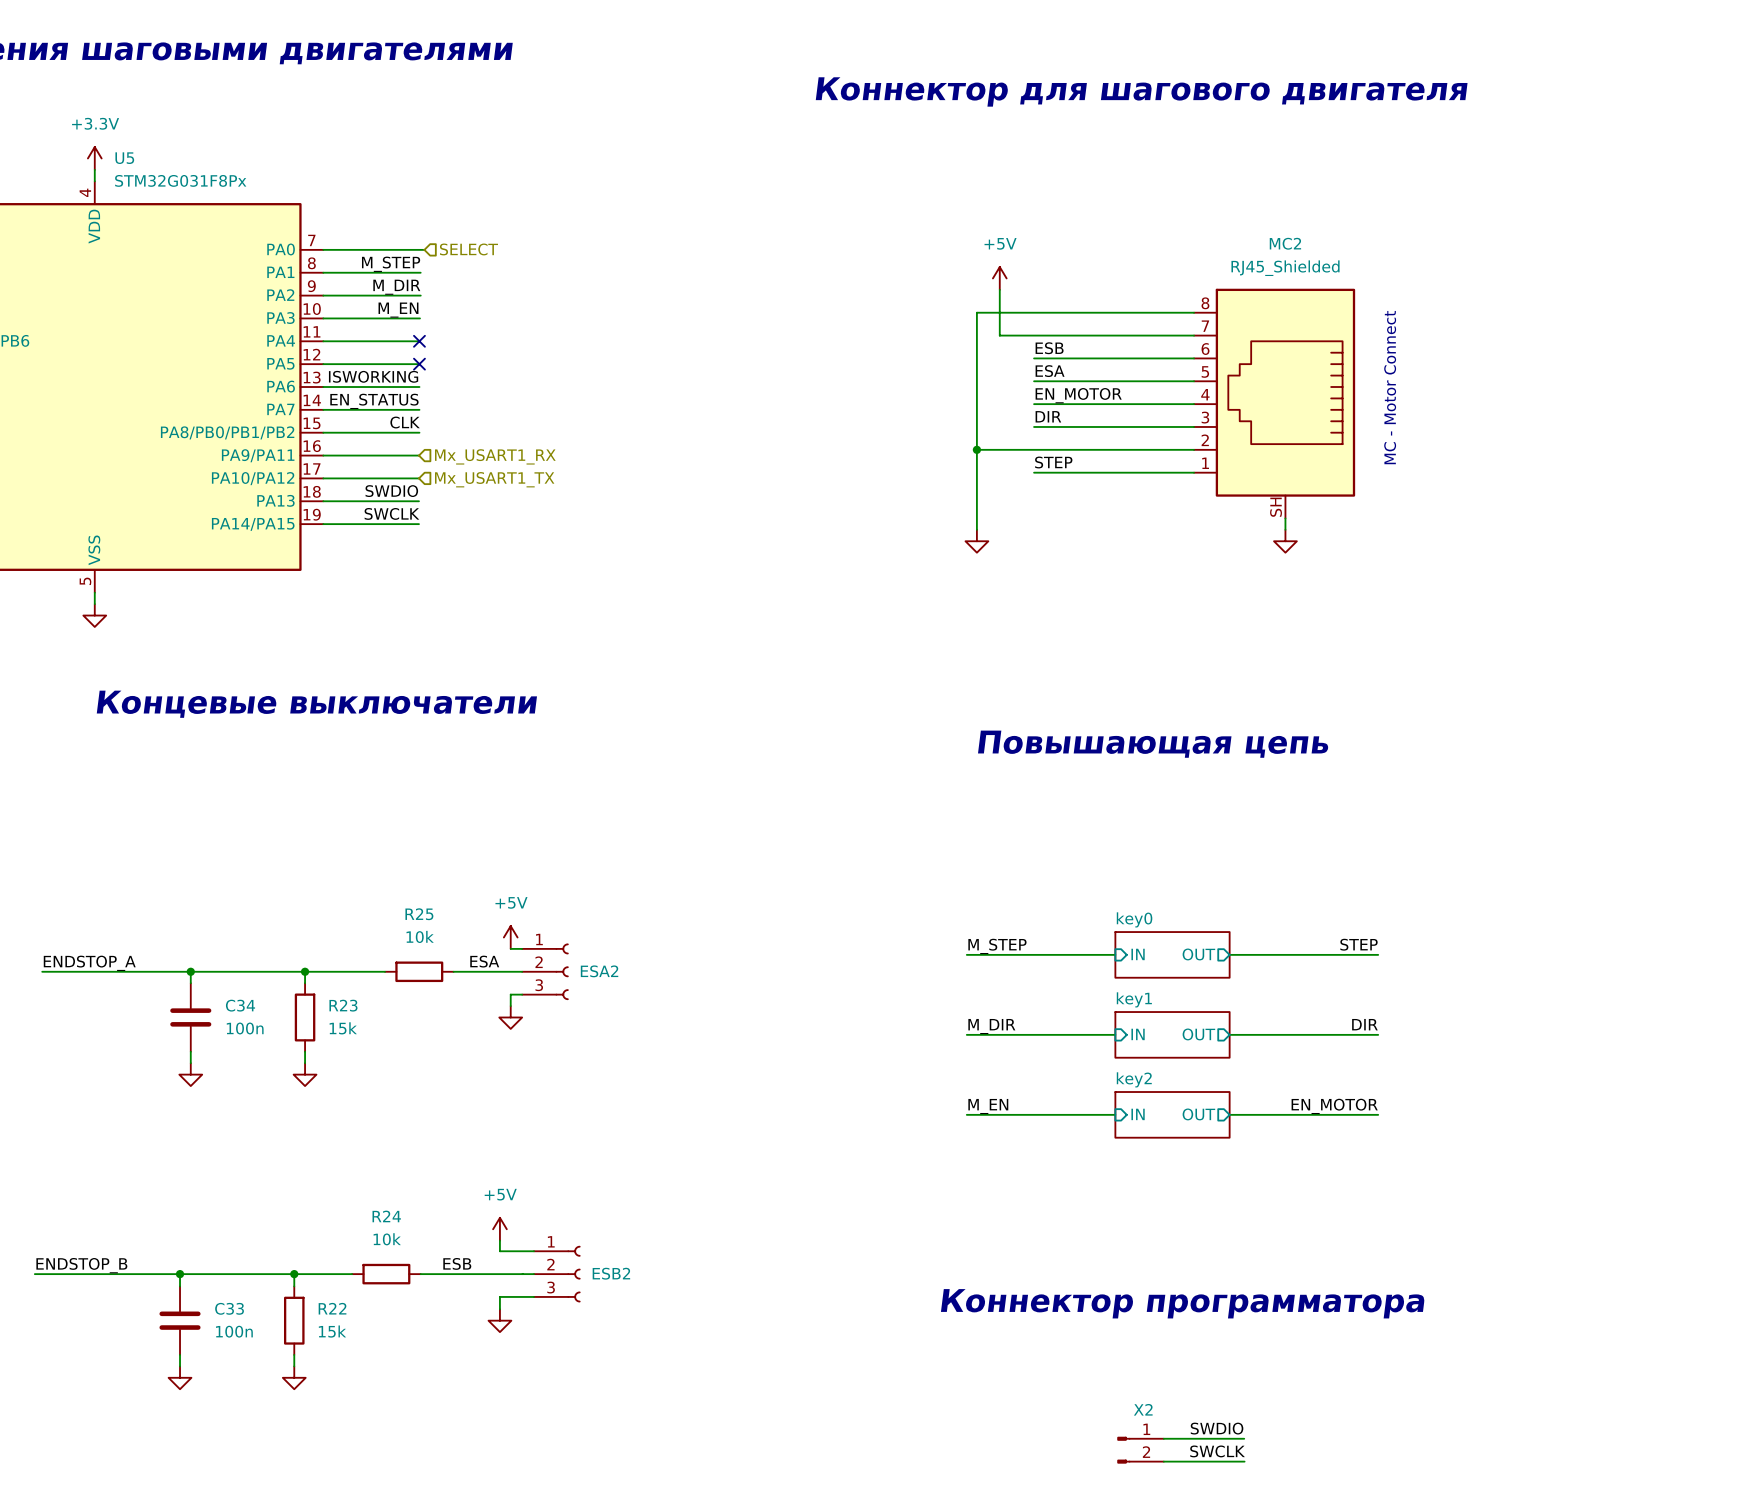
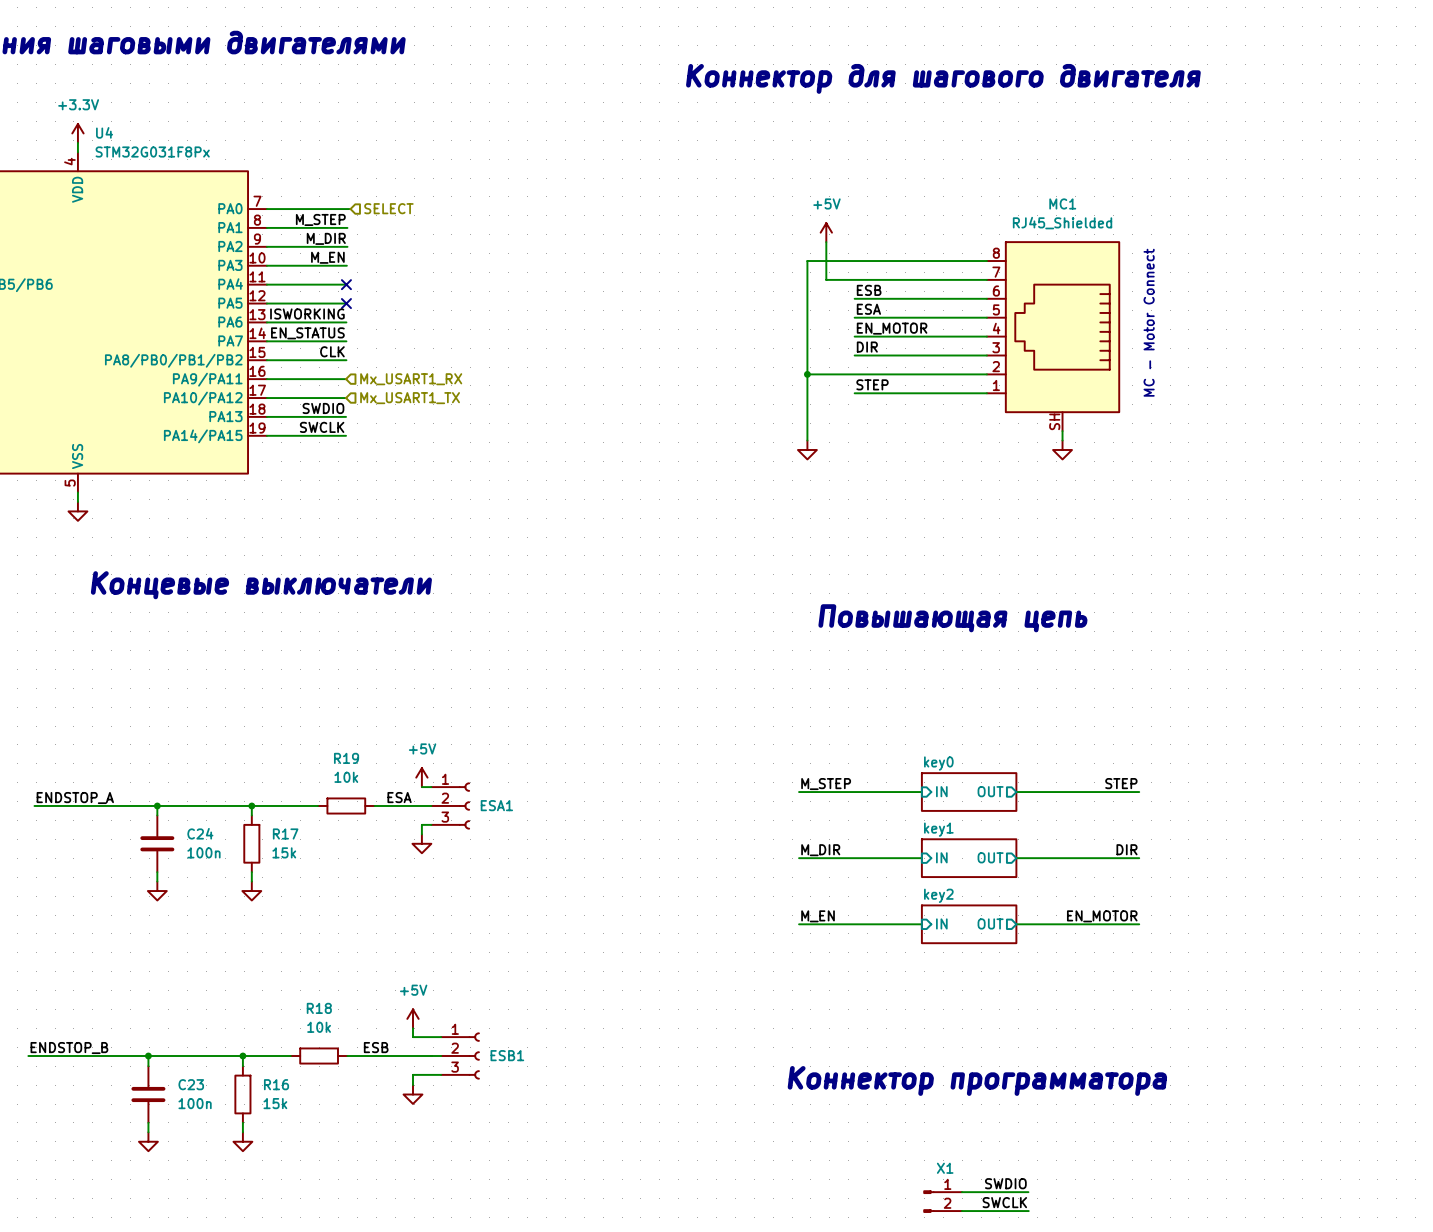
U5 name: U5 (124, 158) -> U4 (104, 132)
MC2 name: MC2 (1285, 243) -> MC1 (1062, 203)
R25 name: R25 (419, 914) -> R19 (346, 758)
ESA2 name: ESA2 (599, 971) -> ESA1 (496, 805)
C34 name: C34 (240, 1005) -> C24 (200, 833)
R23 name: R23 (343, 1005) -> R17 (285, 833)
R24 name: R24 (386, 1216) -> R18 (319, 1008)
ESB2 name: ESB2 (611, 1273) -> ESB1 (507, 1055)
C33 name: C33 (229, 1308) -> C23 (191, 1084)
R22 name: R22 (332, 1308) -> R16 (276, 1084)
X2 name: X2 (1143, 1409) -> X1 (945, 1168)

